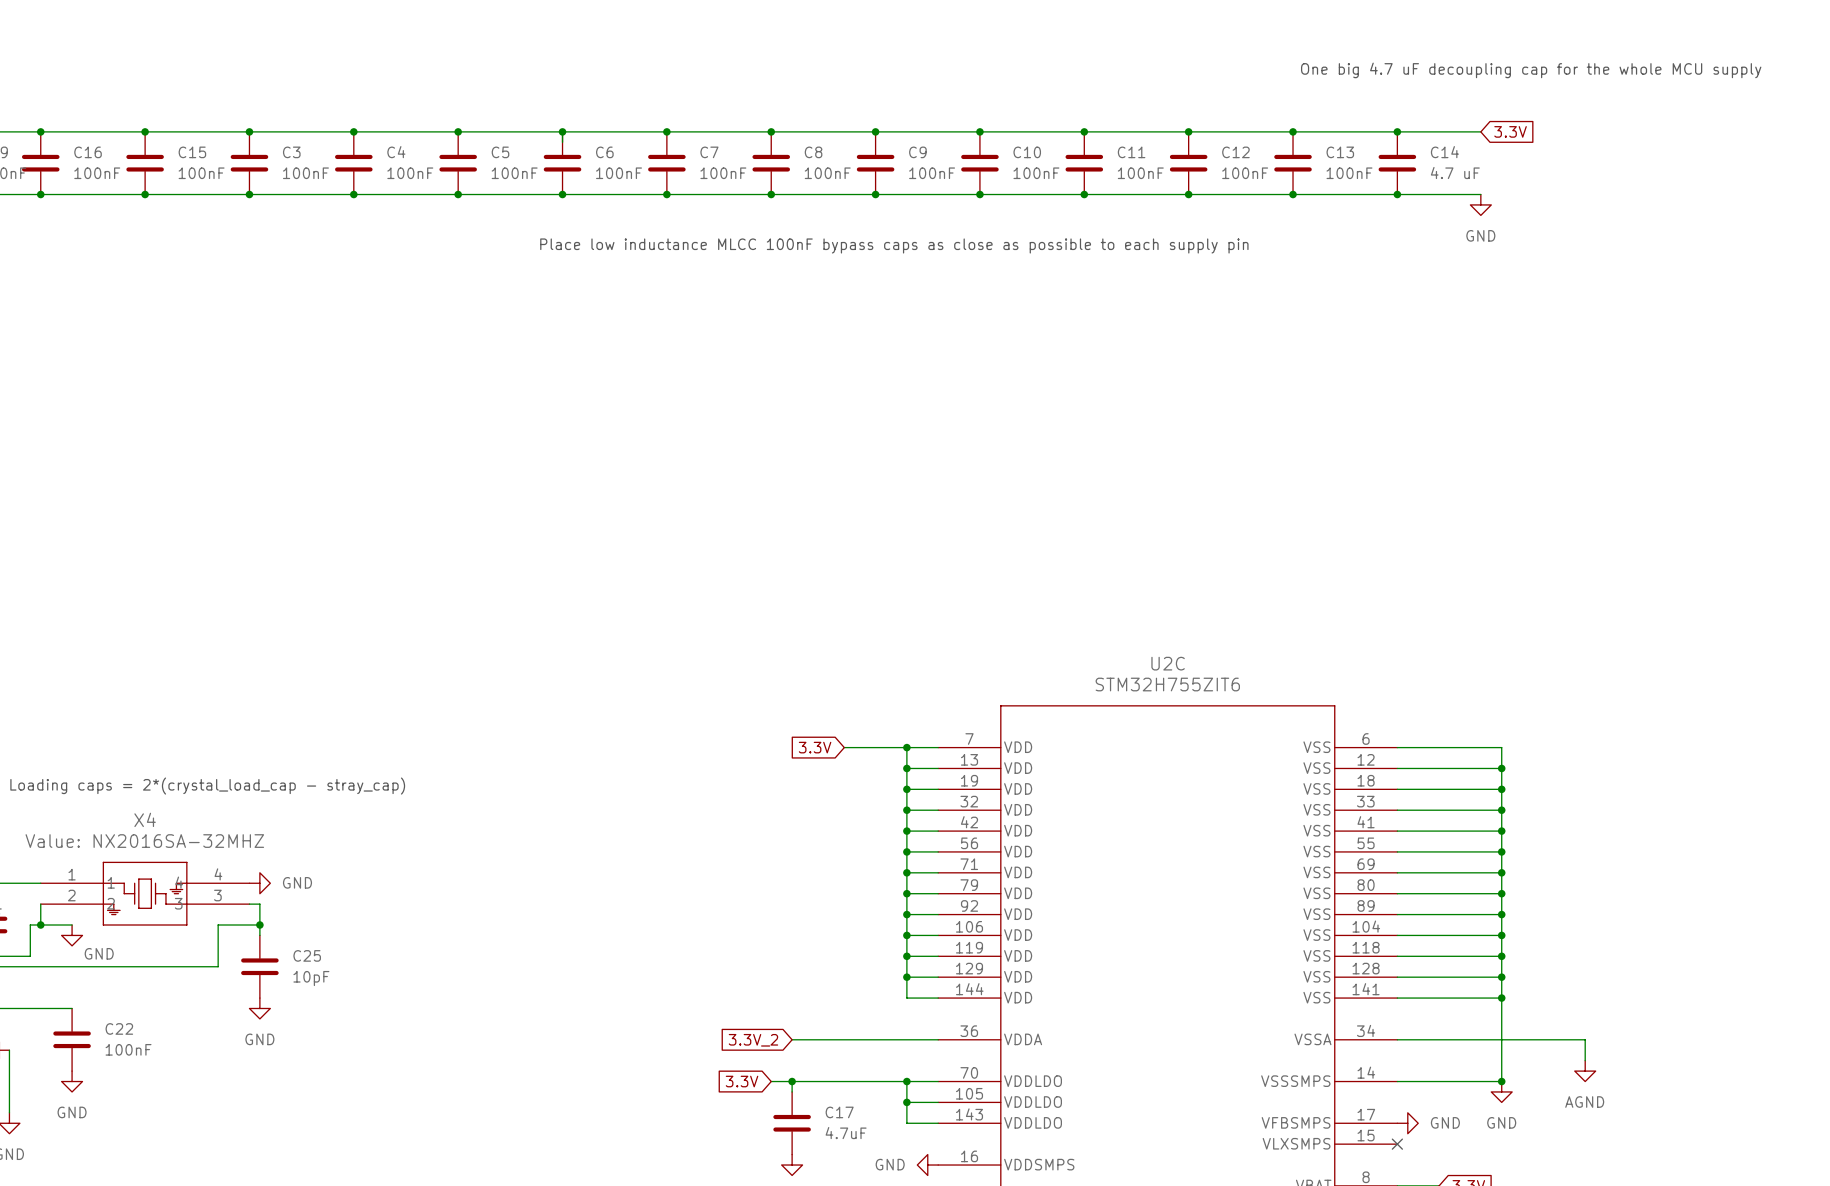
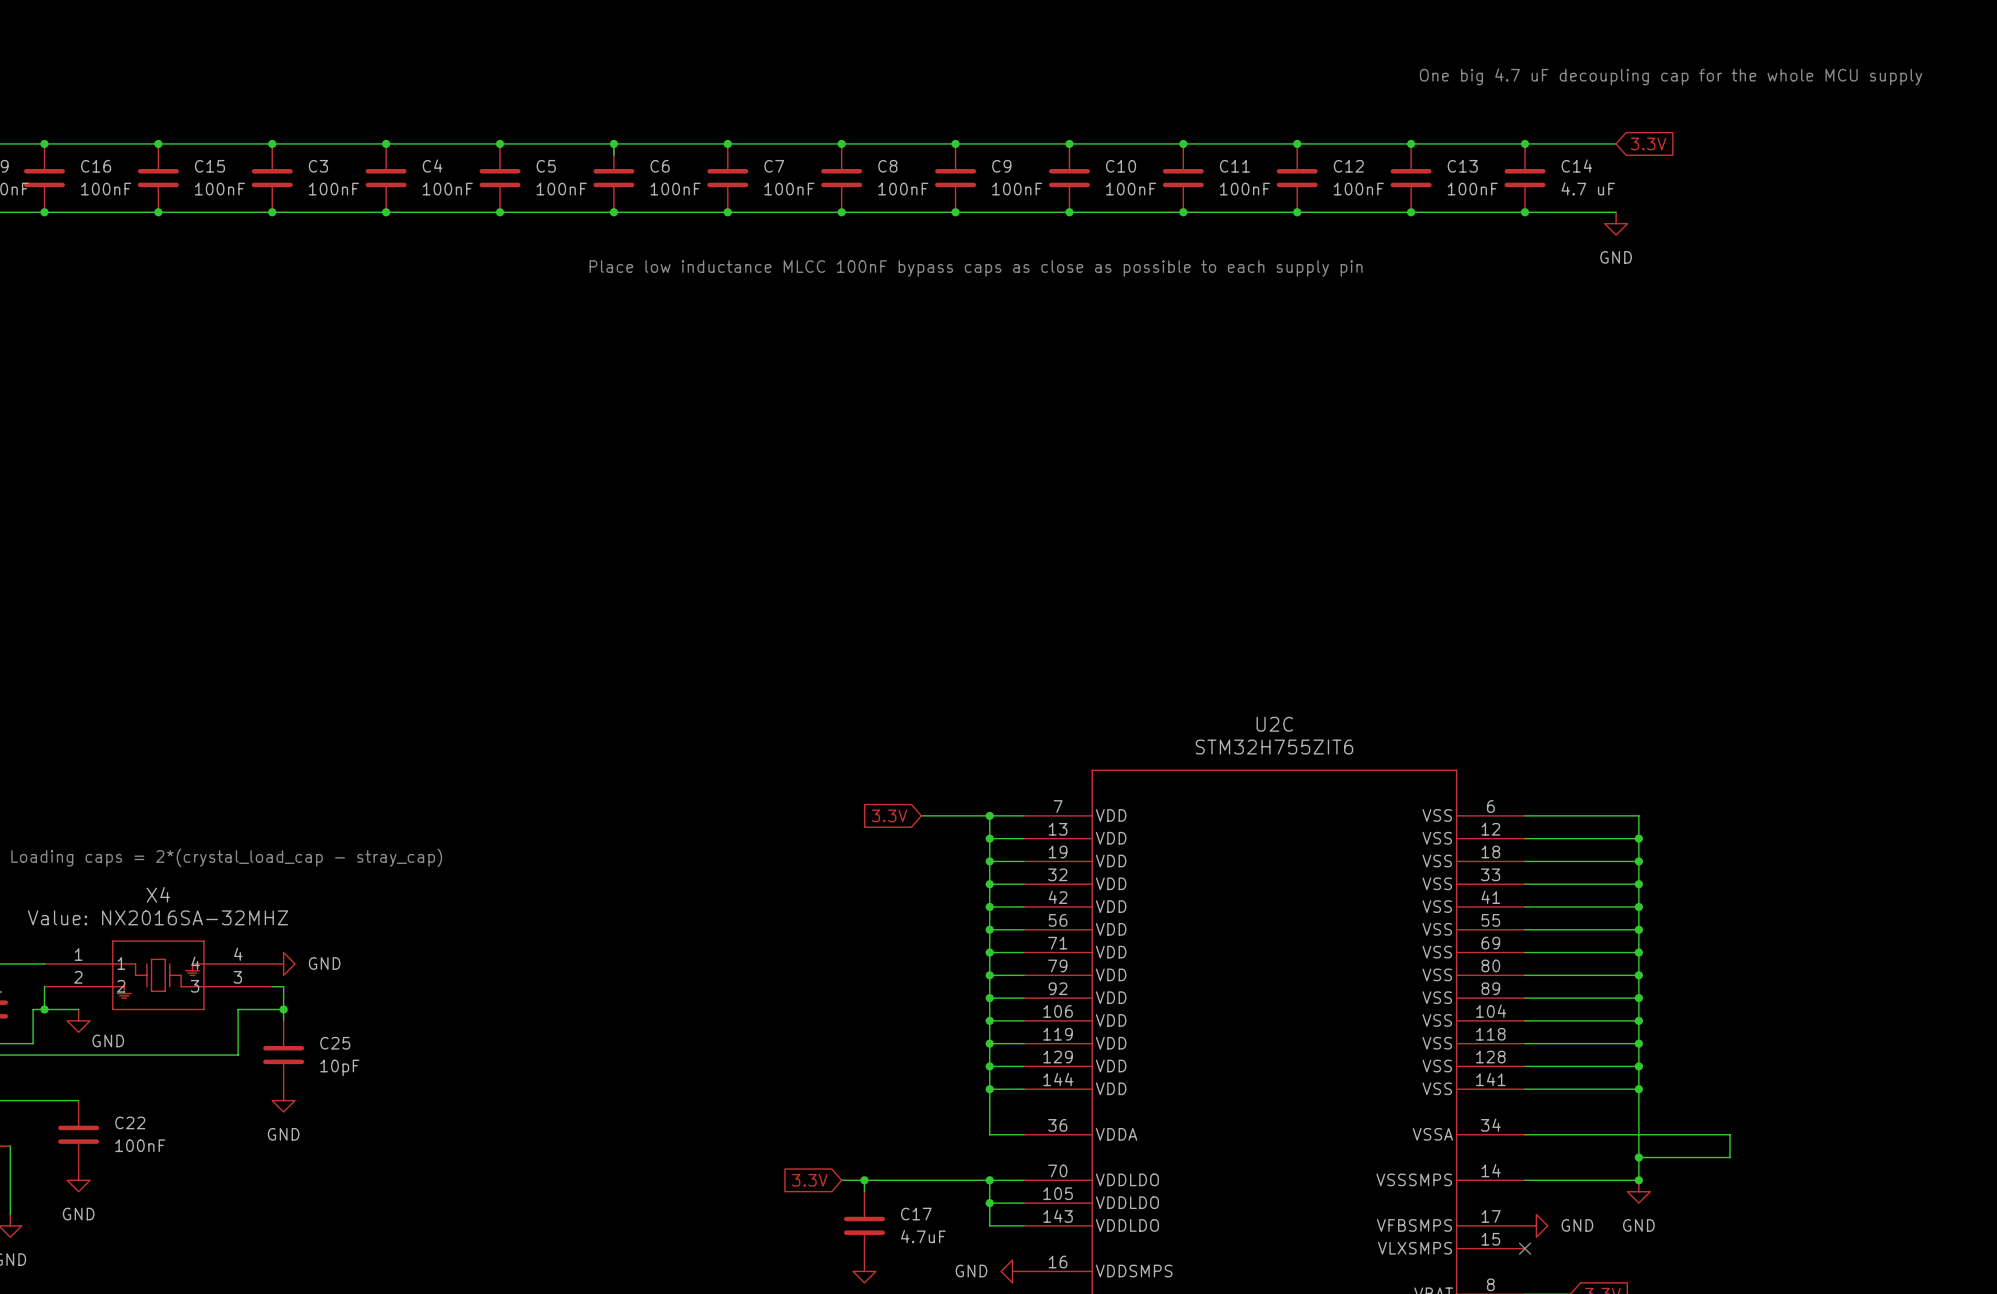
junction: none -> (989, 1089)
wire: (792, 1039) (906, 1039) -> (989, 1089) (989, 1134)
global label: 3.3V_2 (753, 1040) -> none
wire: none -> (1638, 1157) (1729, 1157)
junction: none -> (1638, 1157)
power symbol: AGND (1585, 1071) -> none

